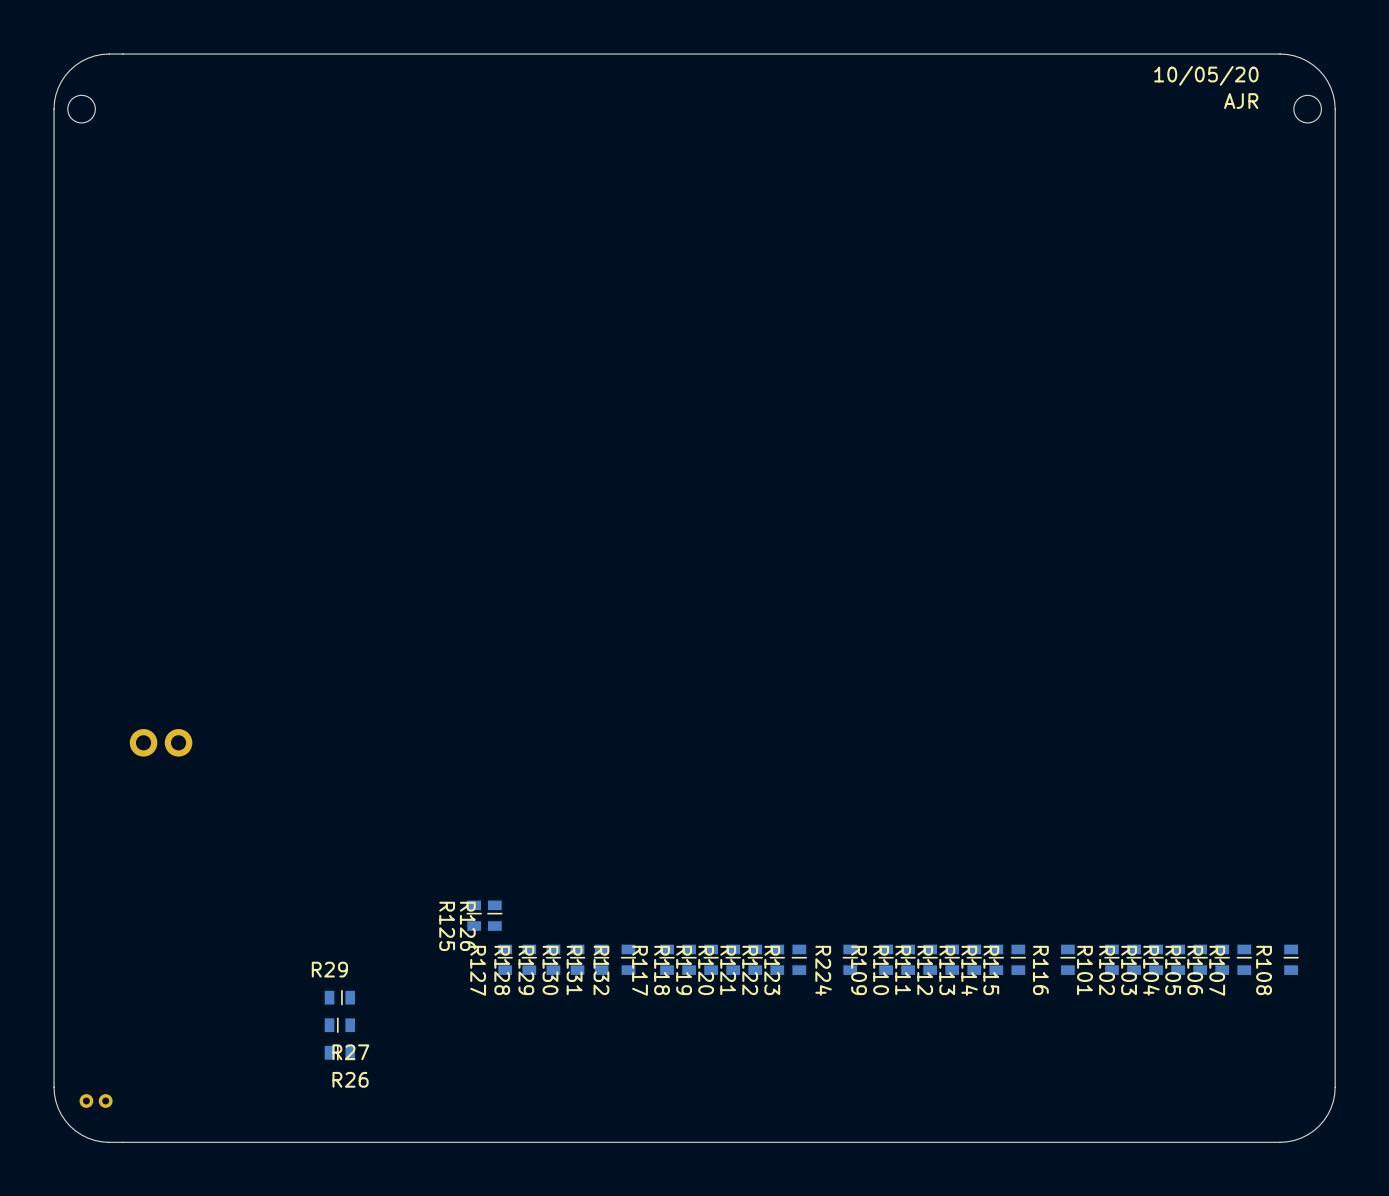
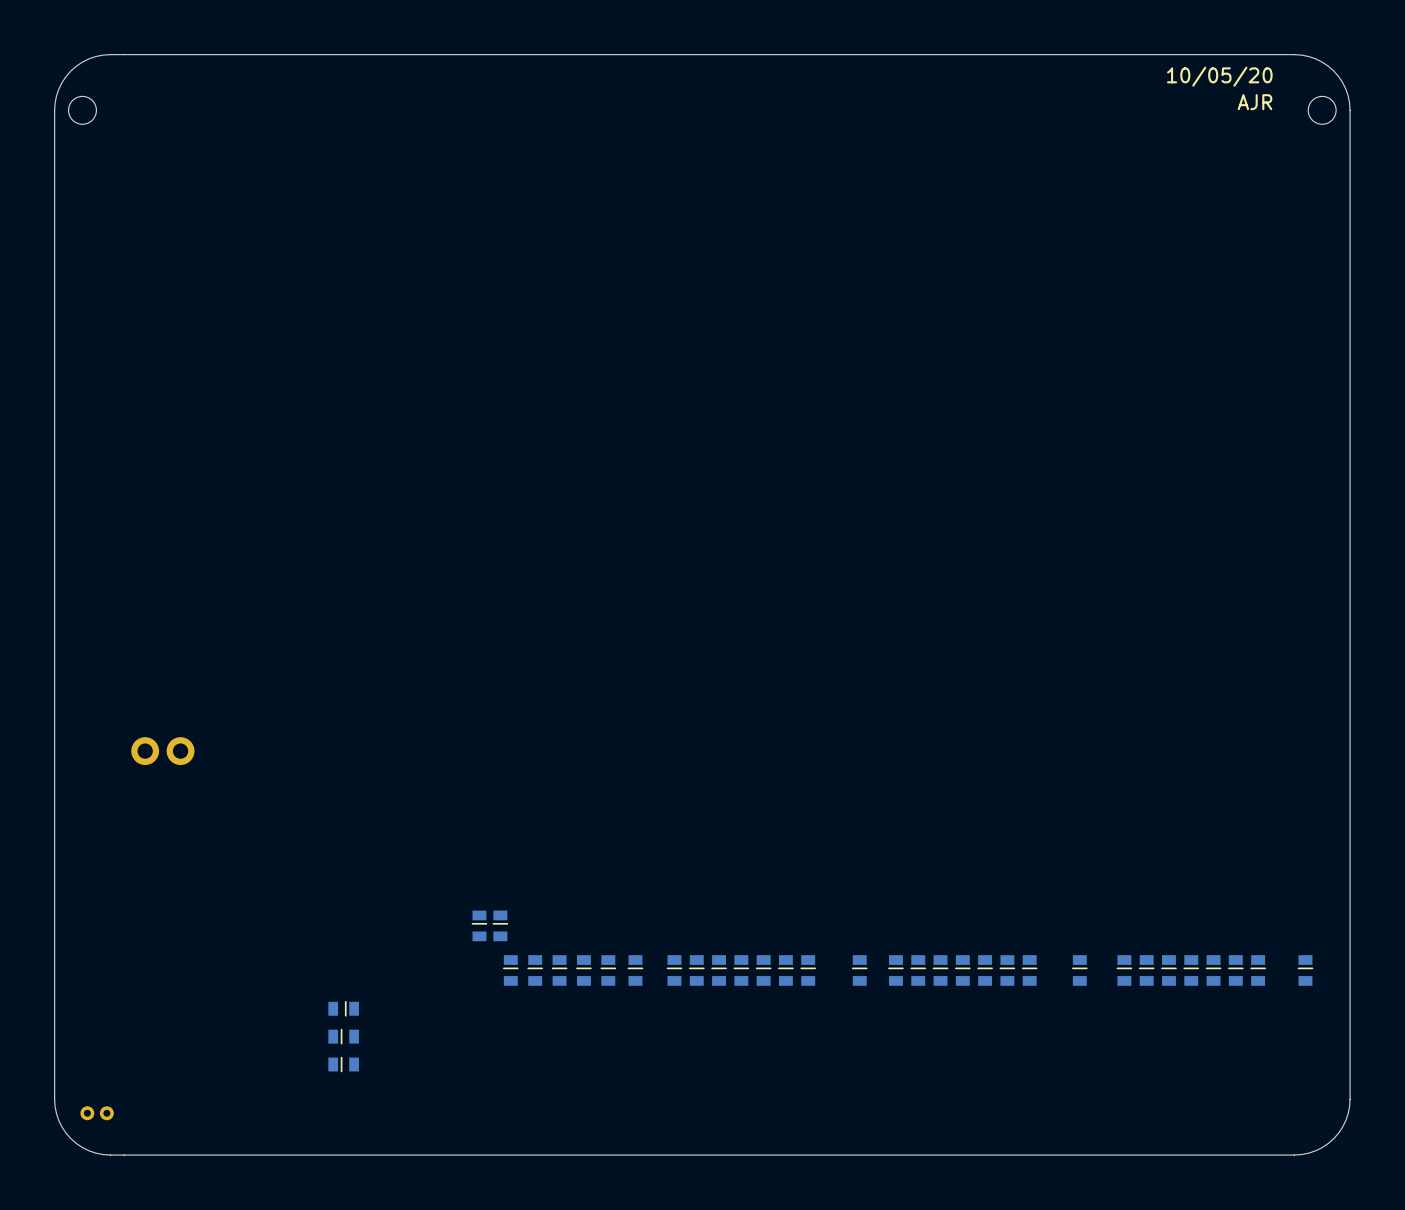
R125 name: R125 (447, 926) -> none
R126 name: R126 (467, 926) -> none
R29 name: R29 (329, 969) -> none
R127 name: R127 (478, 970) -> none
R128 name: R128 (502, 970) -> none
R129 name: R129 (526, 970) -> none
R130 name: R130 (550, 970) -> none
R131 name: R131 (574, 970) -> none
R132 name: R132 (601, 970) -> none
R117 name: R117 (640, 970) -> none
R118 name: R118 (662, 970) -> none
R119 name: R119 (684, 970) -> none
R120 name: R120 (706, 970) -> none
R121 name: R121 (728, 970) -> none
R122 name: R122 (750, 970) -> none
R123 name: R123 (772, 970) -> none
R224 name: R224 (823, 970) -> none
R109 name: R109 (859, 970) -> none
R110 name: R110 (881, 970) -> none
R111 name: R111 (903, 970) -> none
R112 name: R112 (925, 970) -> none
R113 name: R113 (947, 970) -> none
R114 name: R114 (969, 970) -> none
R115 name: R115 (991, 970) -> none
R116 name: R116 (1040, 970) -> none
R101 name: R101 (1084, 970) -> none
R102 name: R102 (1107, 970) -> none
R103 name: R103 (1129, 970) -> none
R104 name: R104 (1151, 970) -> none
R105 name: R105 (1173, 970) -> none
R106 name: R106 (1195, 970) -> none
R107 name: R107 (1217, 970) -> none
R108 name: R108 (1264, 970) -> none
R27 name: R27 (350, 1052) -> none
R26 name: R26 (350, 1079) -> none

